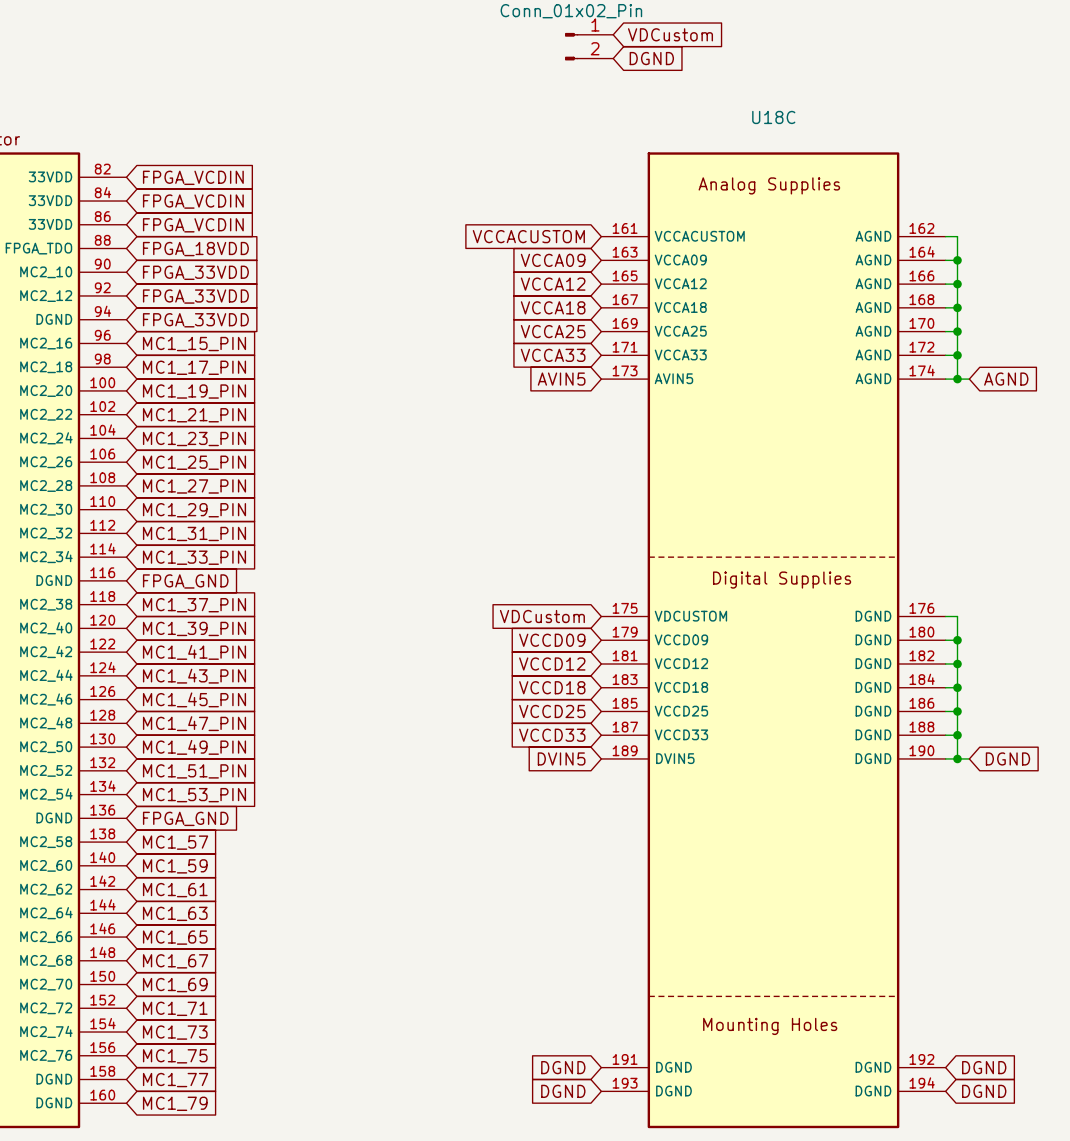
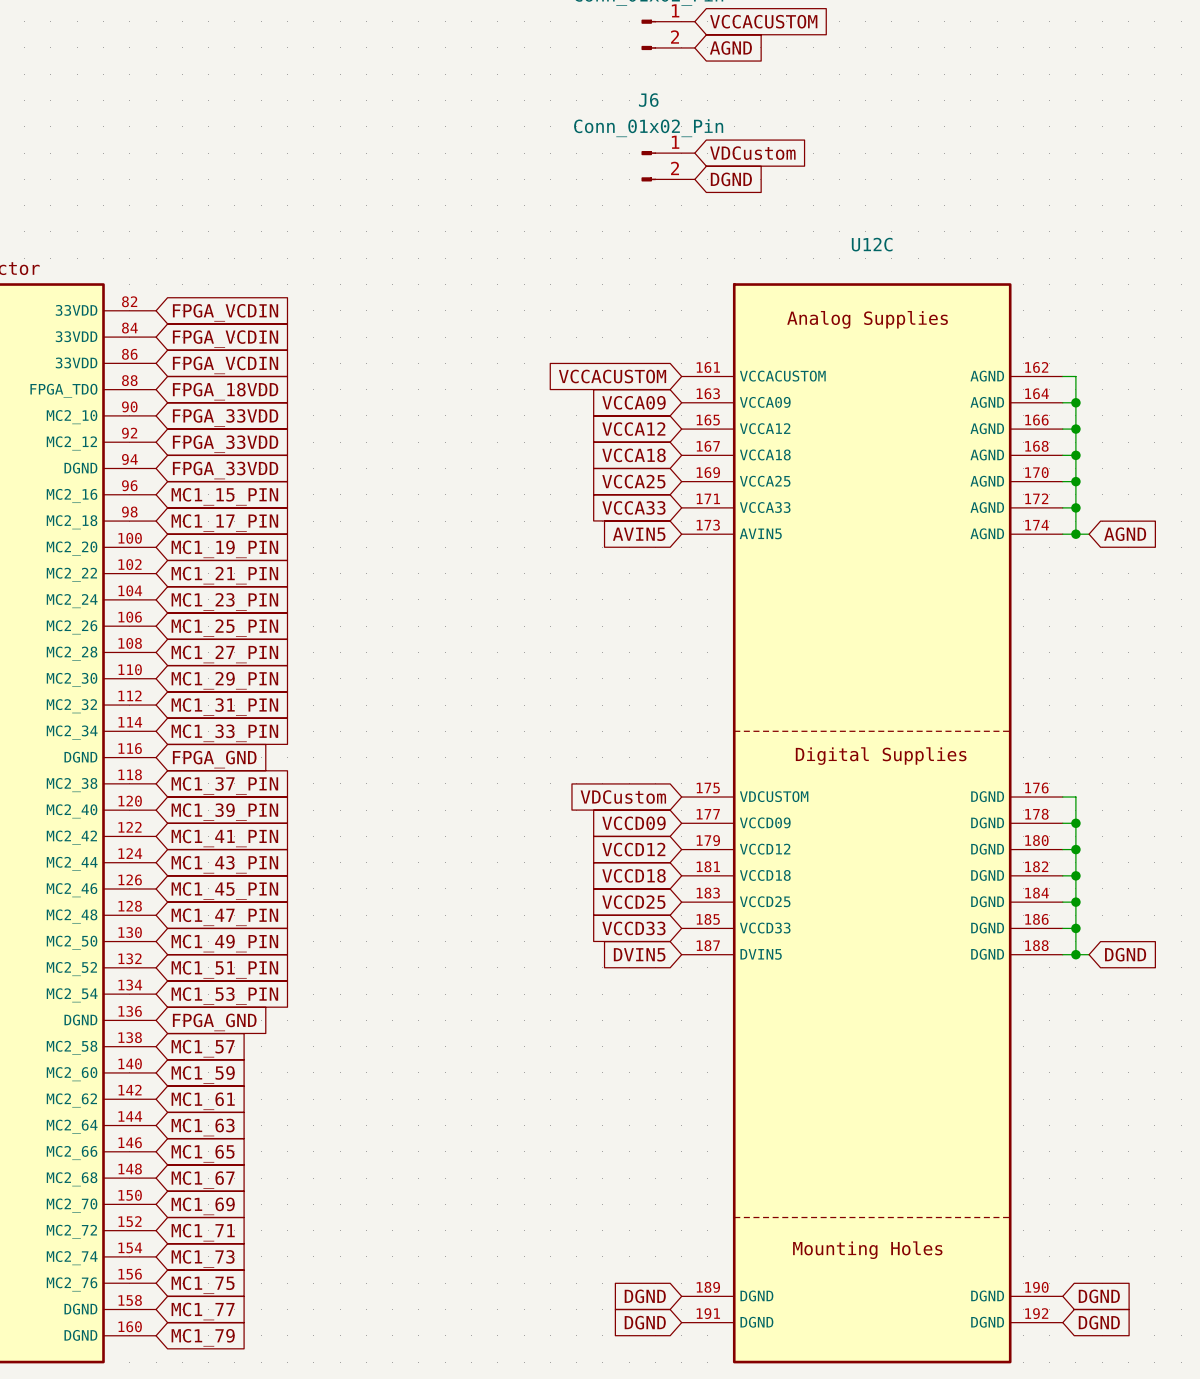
U18C name: U18C (773, 117) -> U12C (872, 244)
U18C symbol: [601, 152, 946, 1129] -> [681, 283, 1063, 1364]

